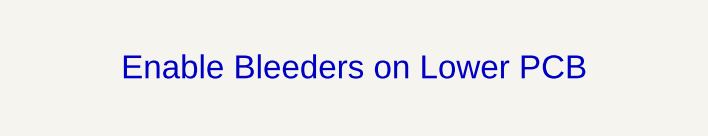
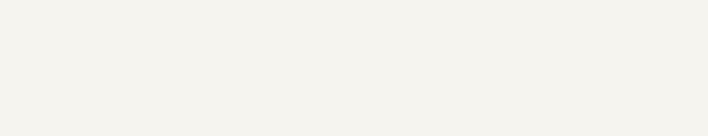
text: Enable Bleeders on Lower PCB (354, 66) -> none

